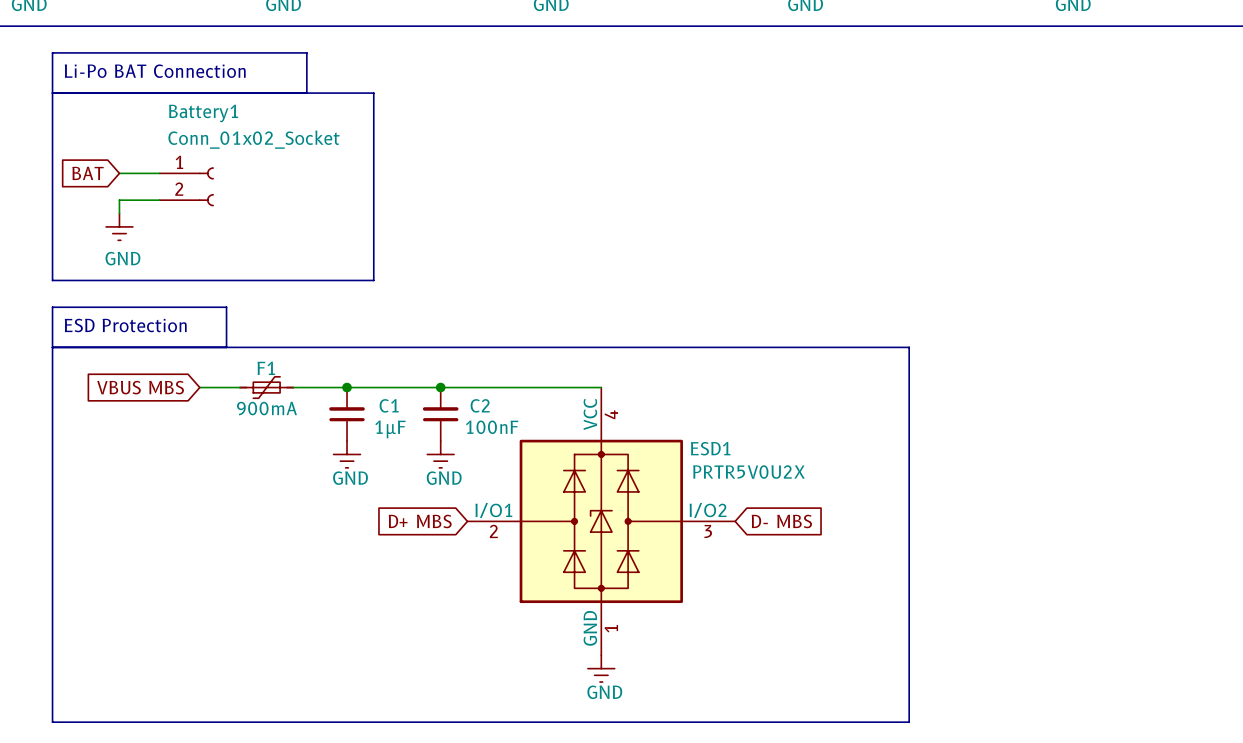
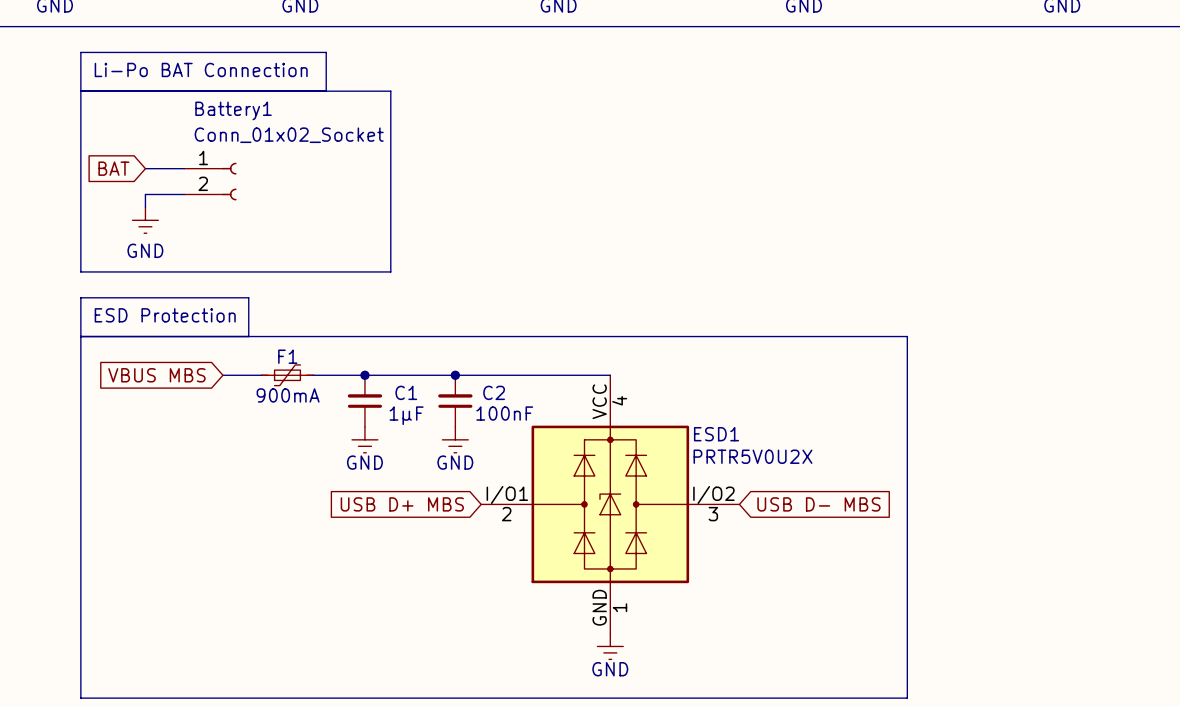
global label: D+ MBS (420, 521) -> USB D+ MBS (402, 504)
global label: D- MBS (781, 521) -> USB D- MBS (818, 504)

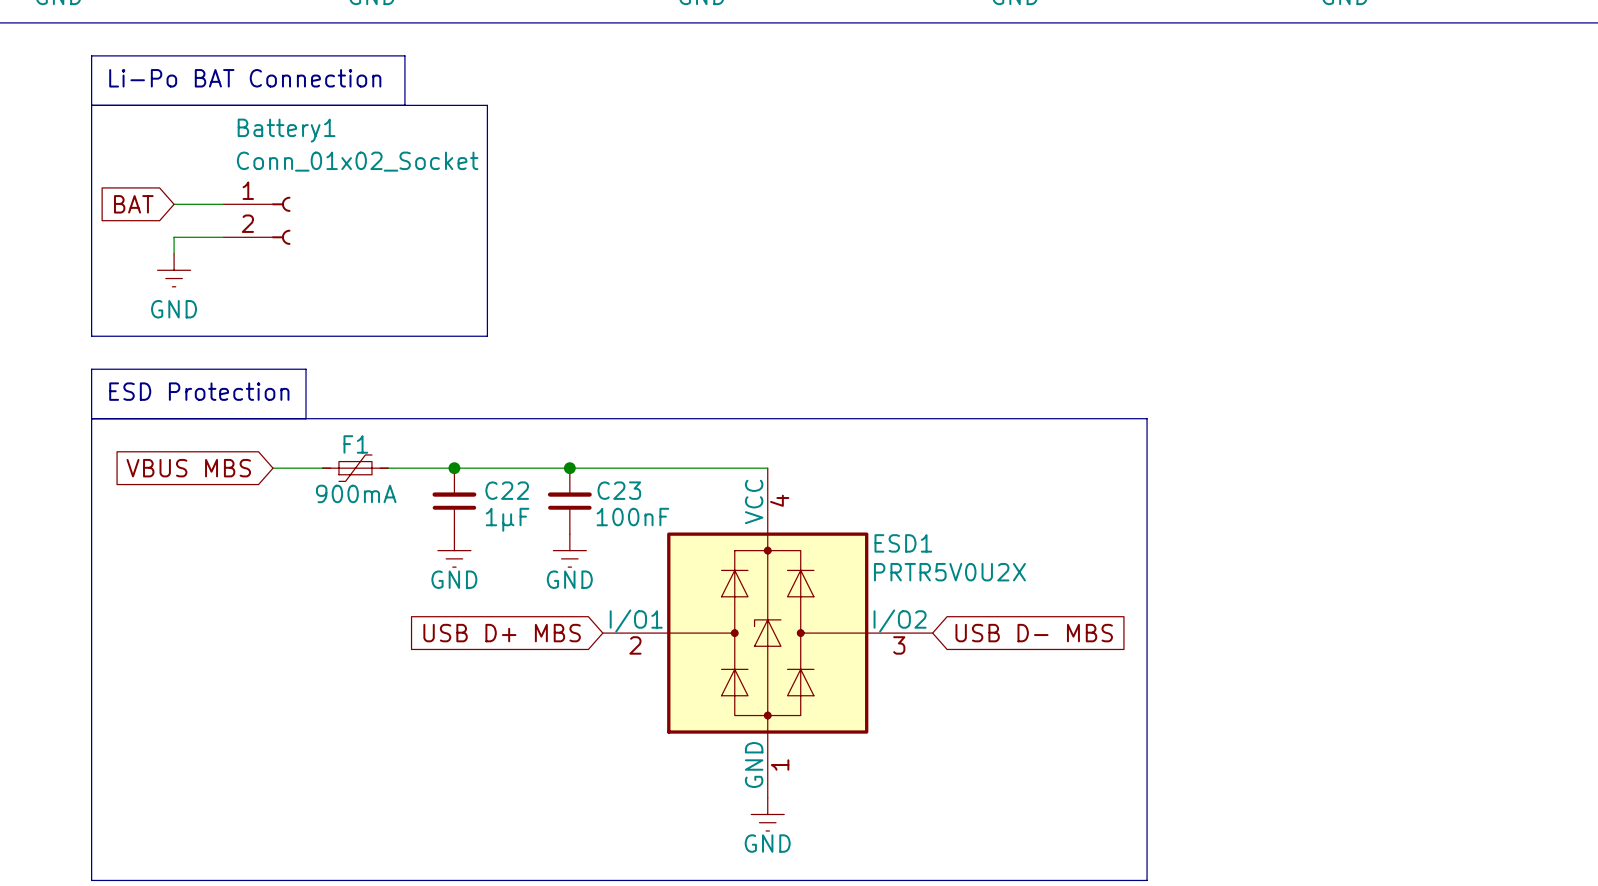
C1 name: C1 (406, 392) -> C22 (507, 490)
C2 name: C2 (494, 392) -> C23 (619, 490)

